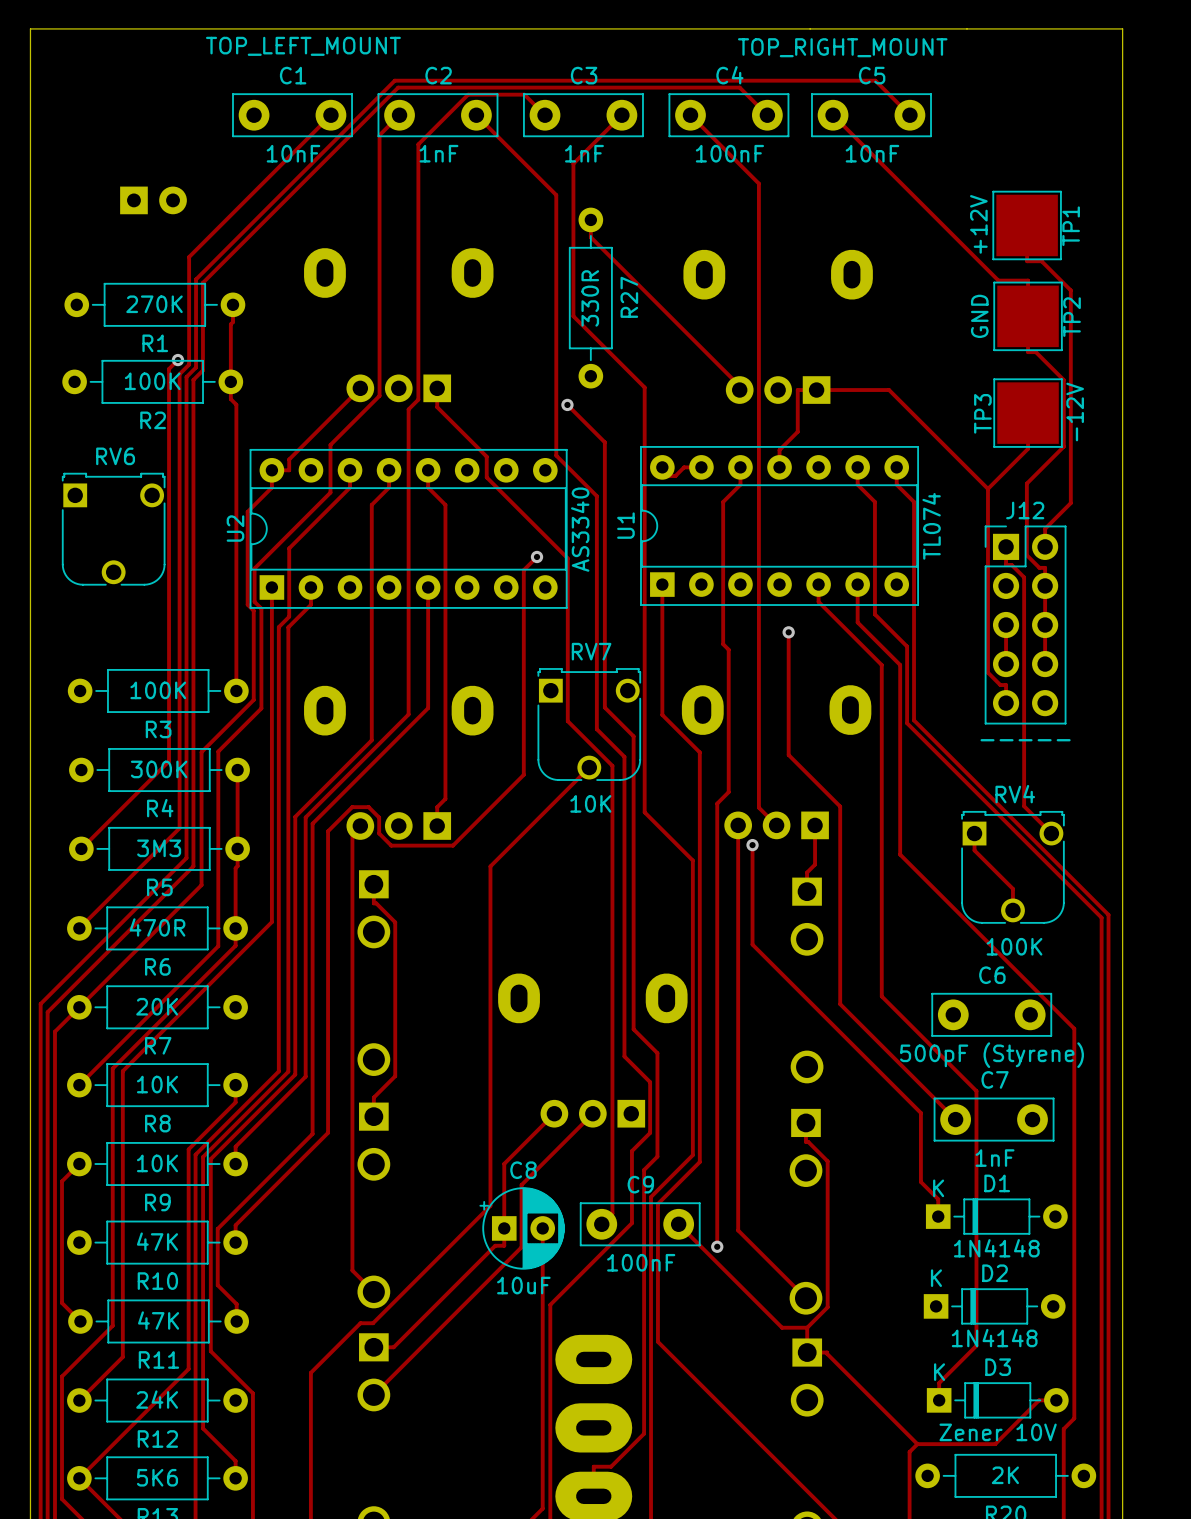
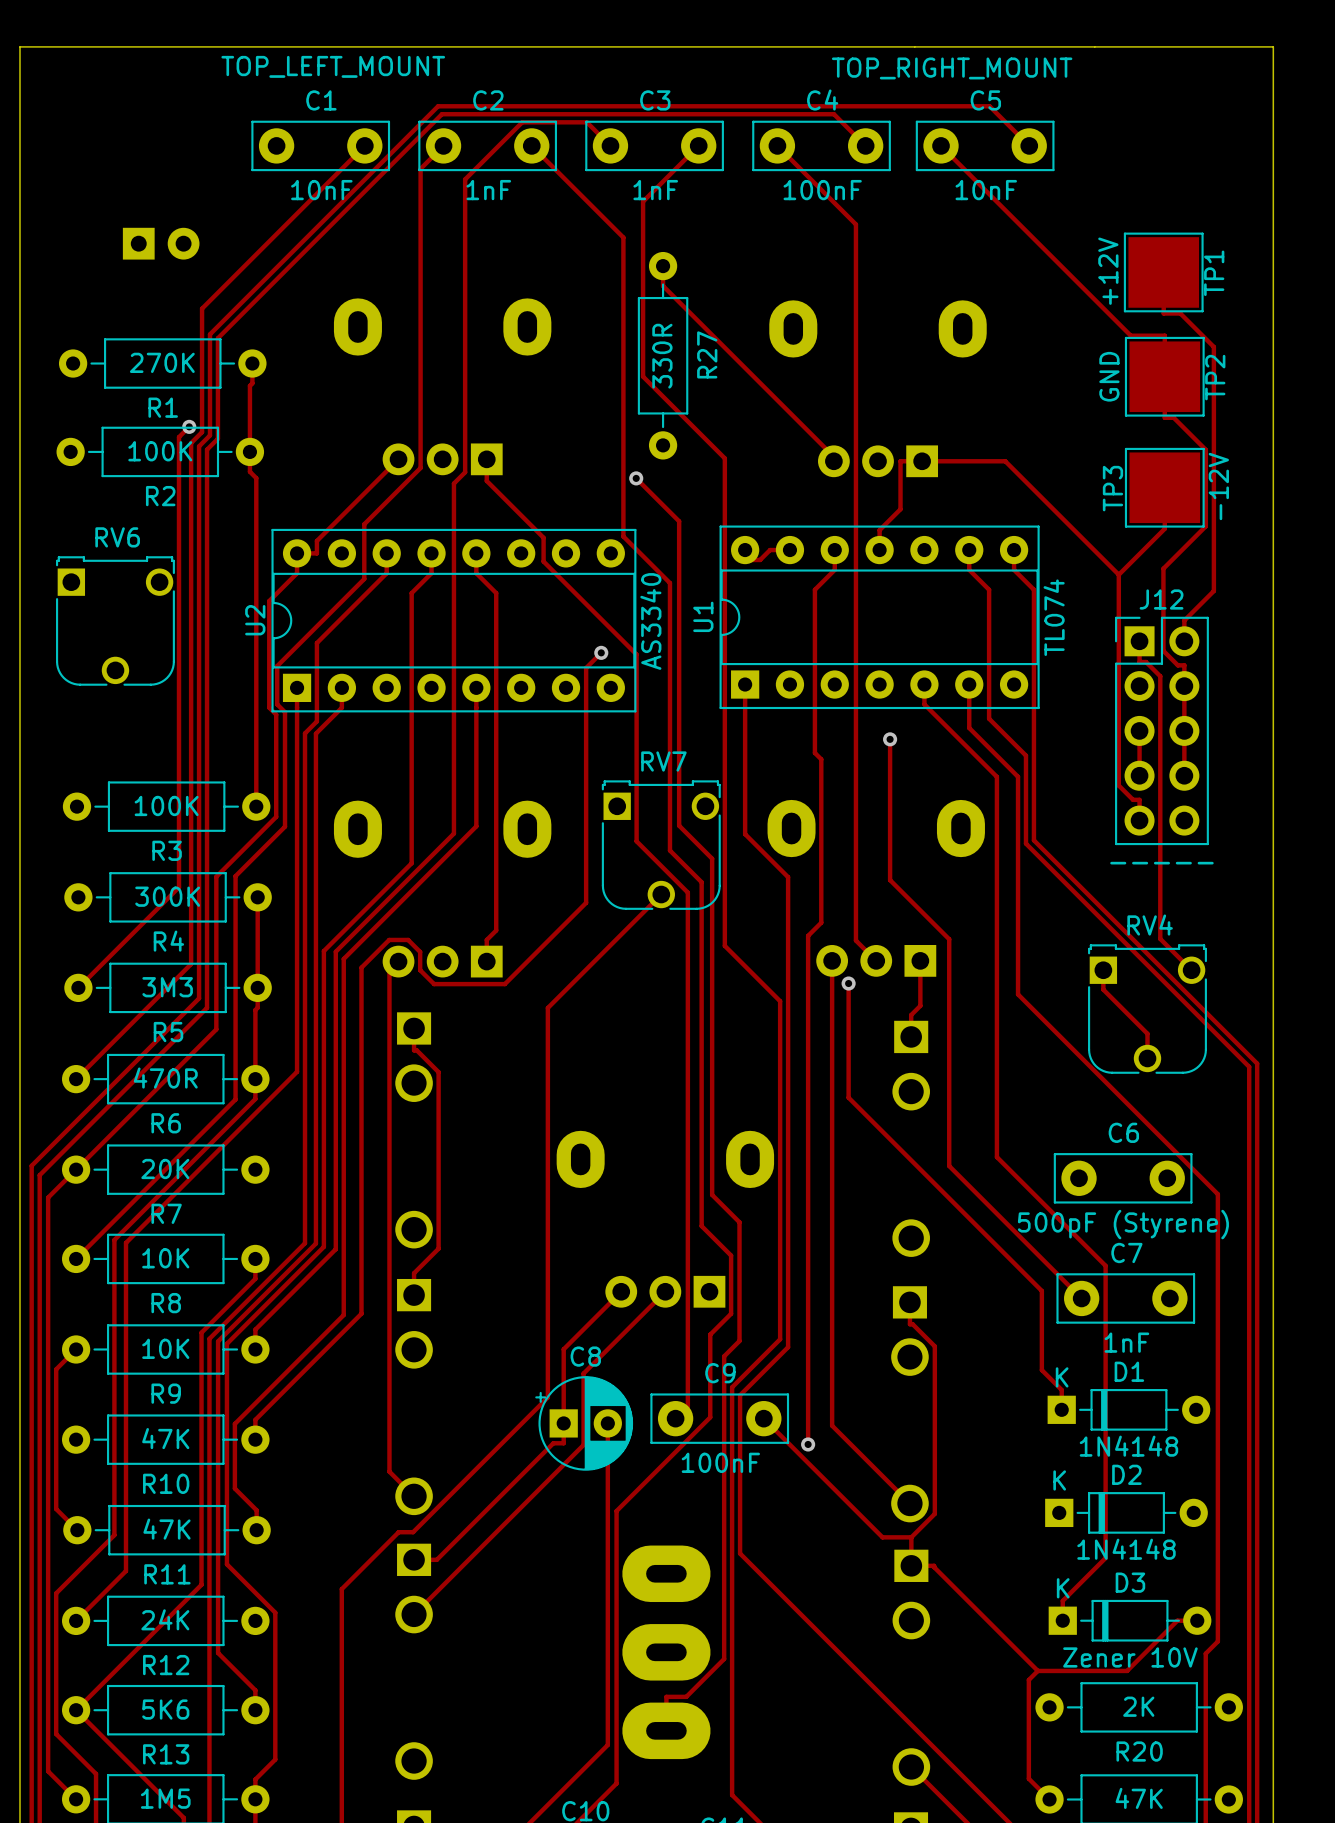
RV7 value: 10K (590, 803) -> none
RV4 value: 100K (1014, 946) -> none
C8 value: 10uF (523, 1285) -> none

